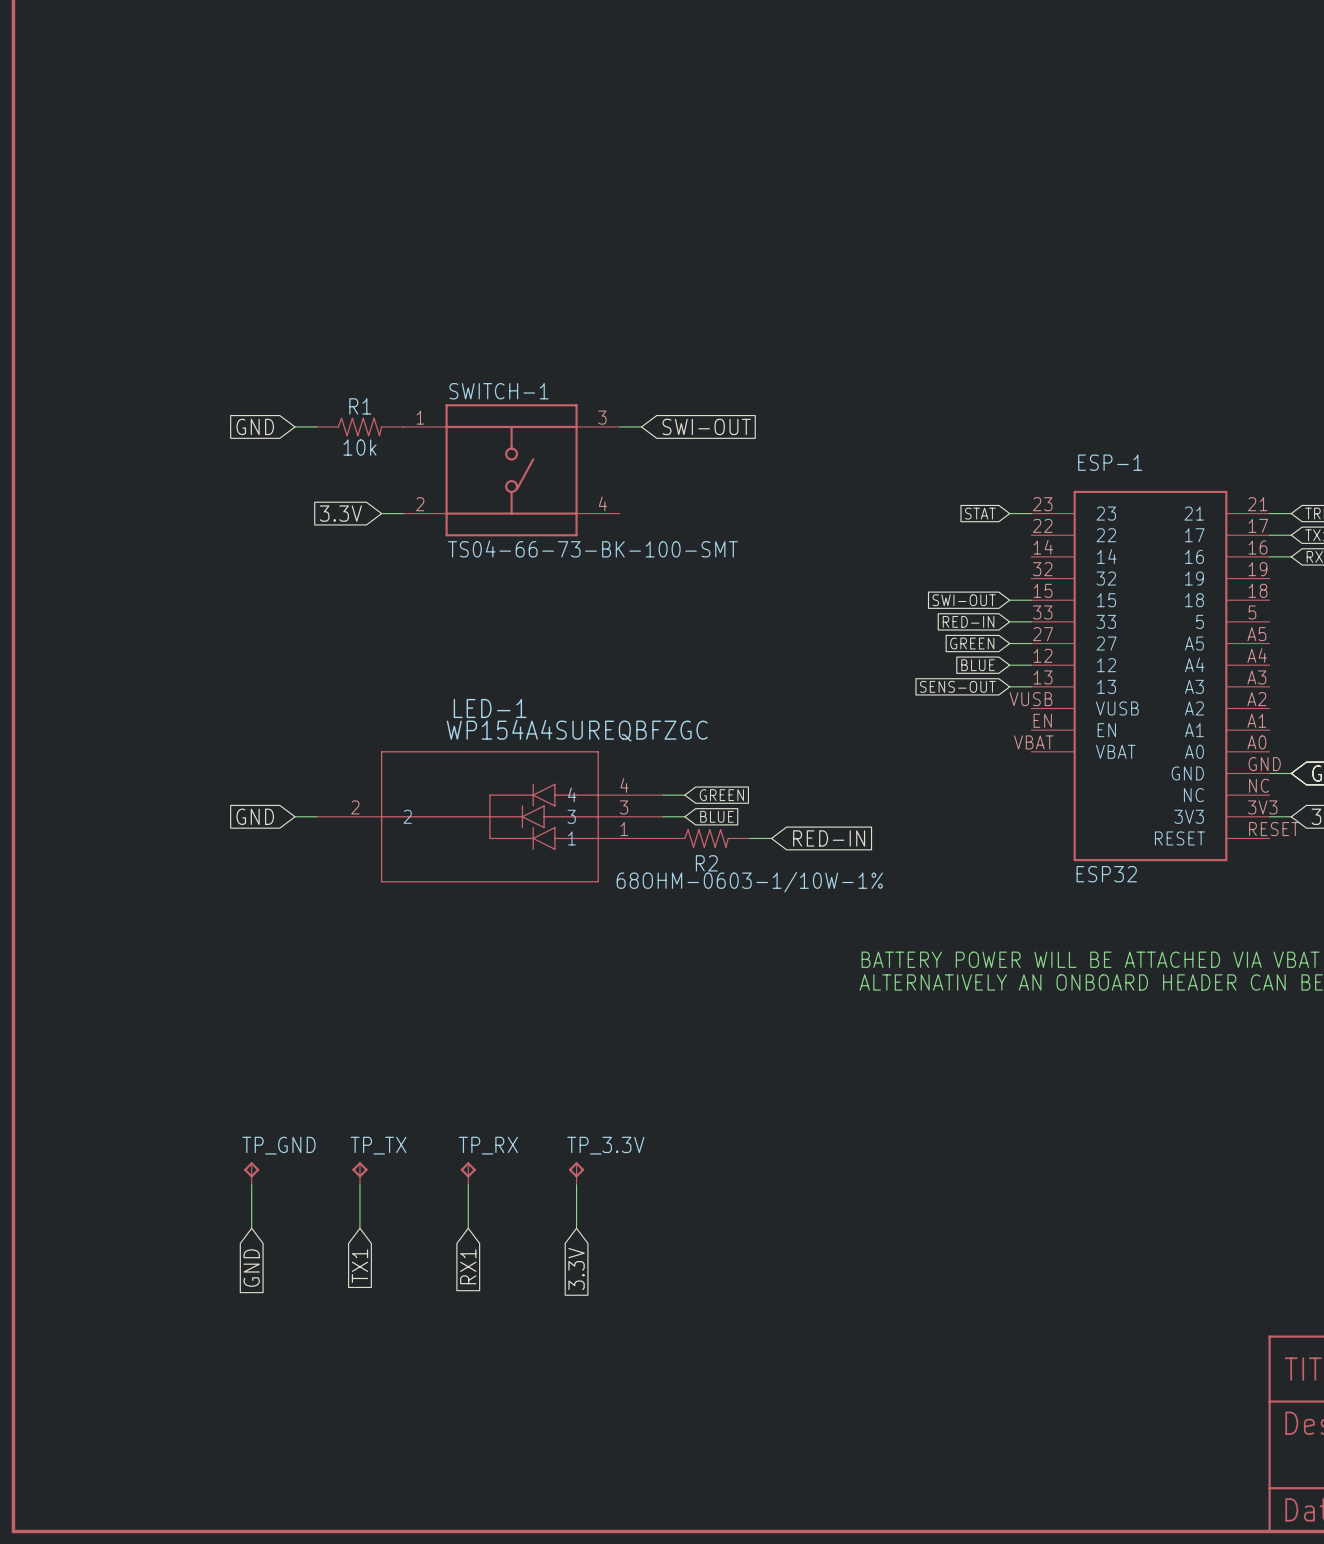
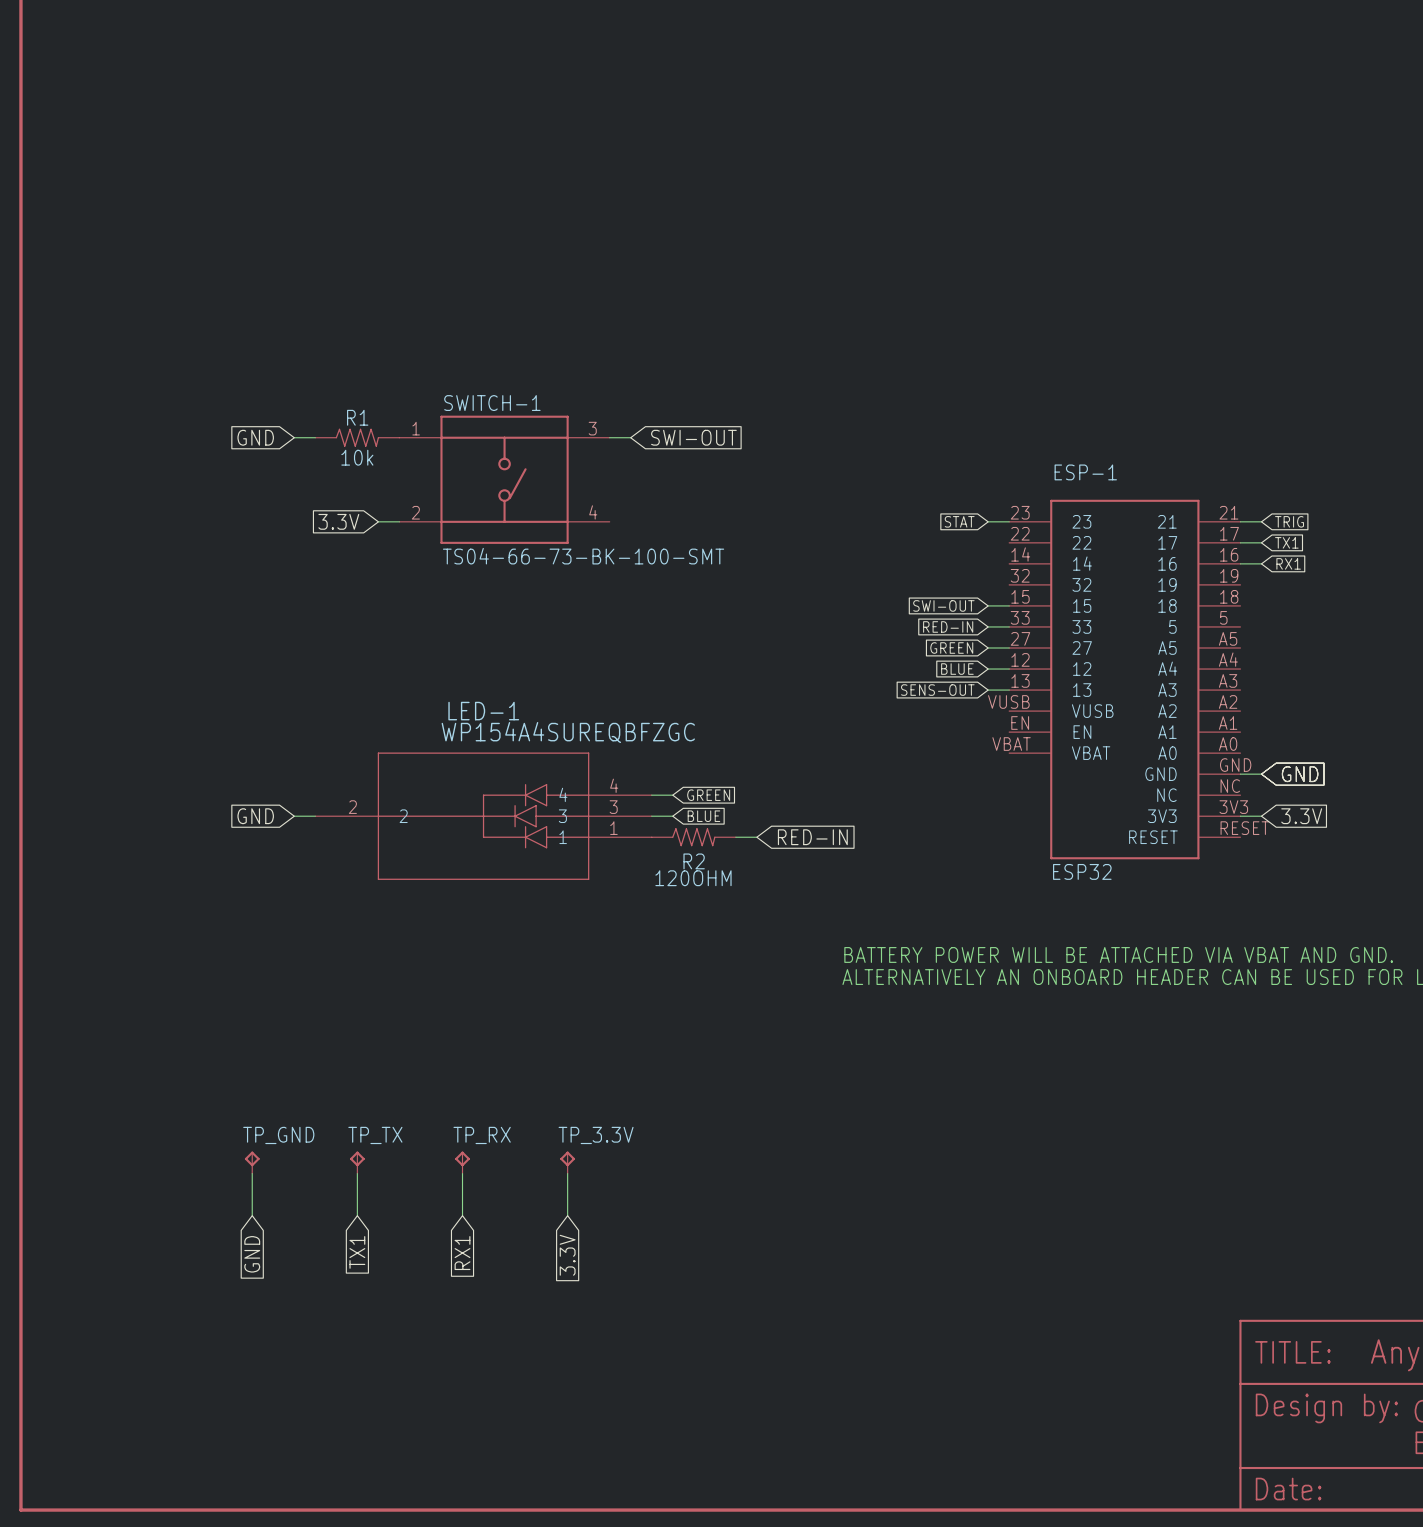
R2 value: 68OHM-0603-1/10W-1% (749, 882) -> 120OHM (693, 878)

